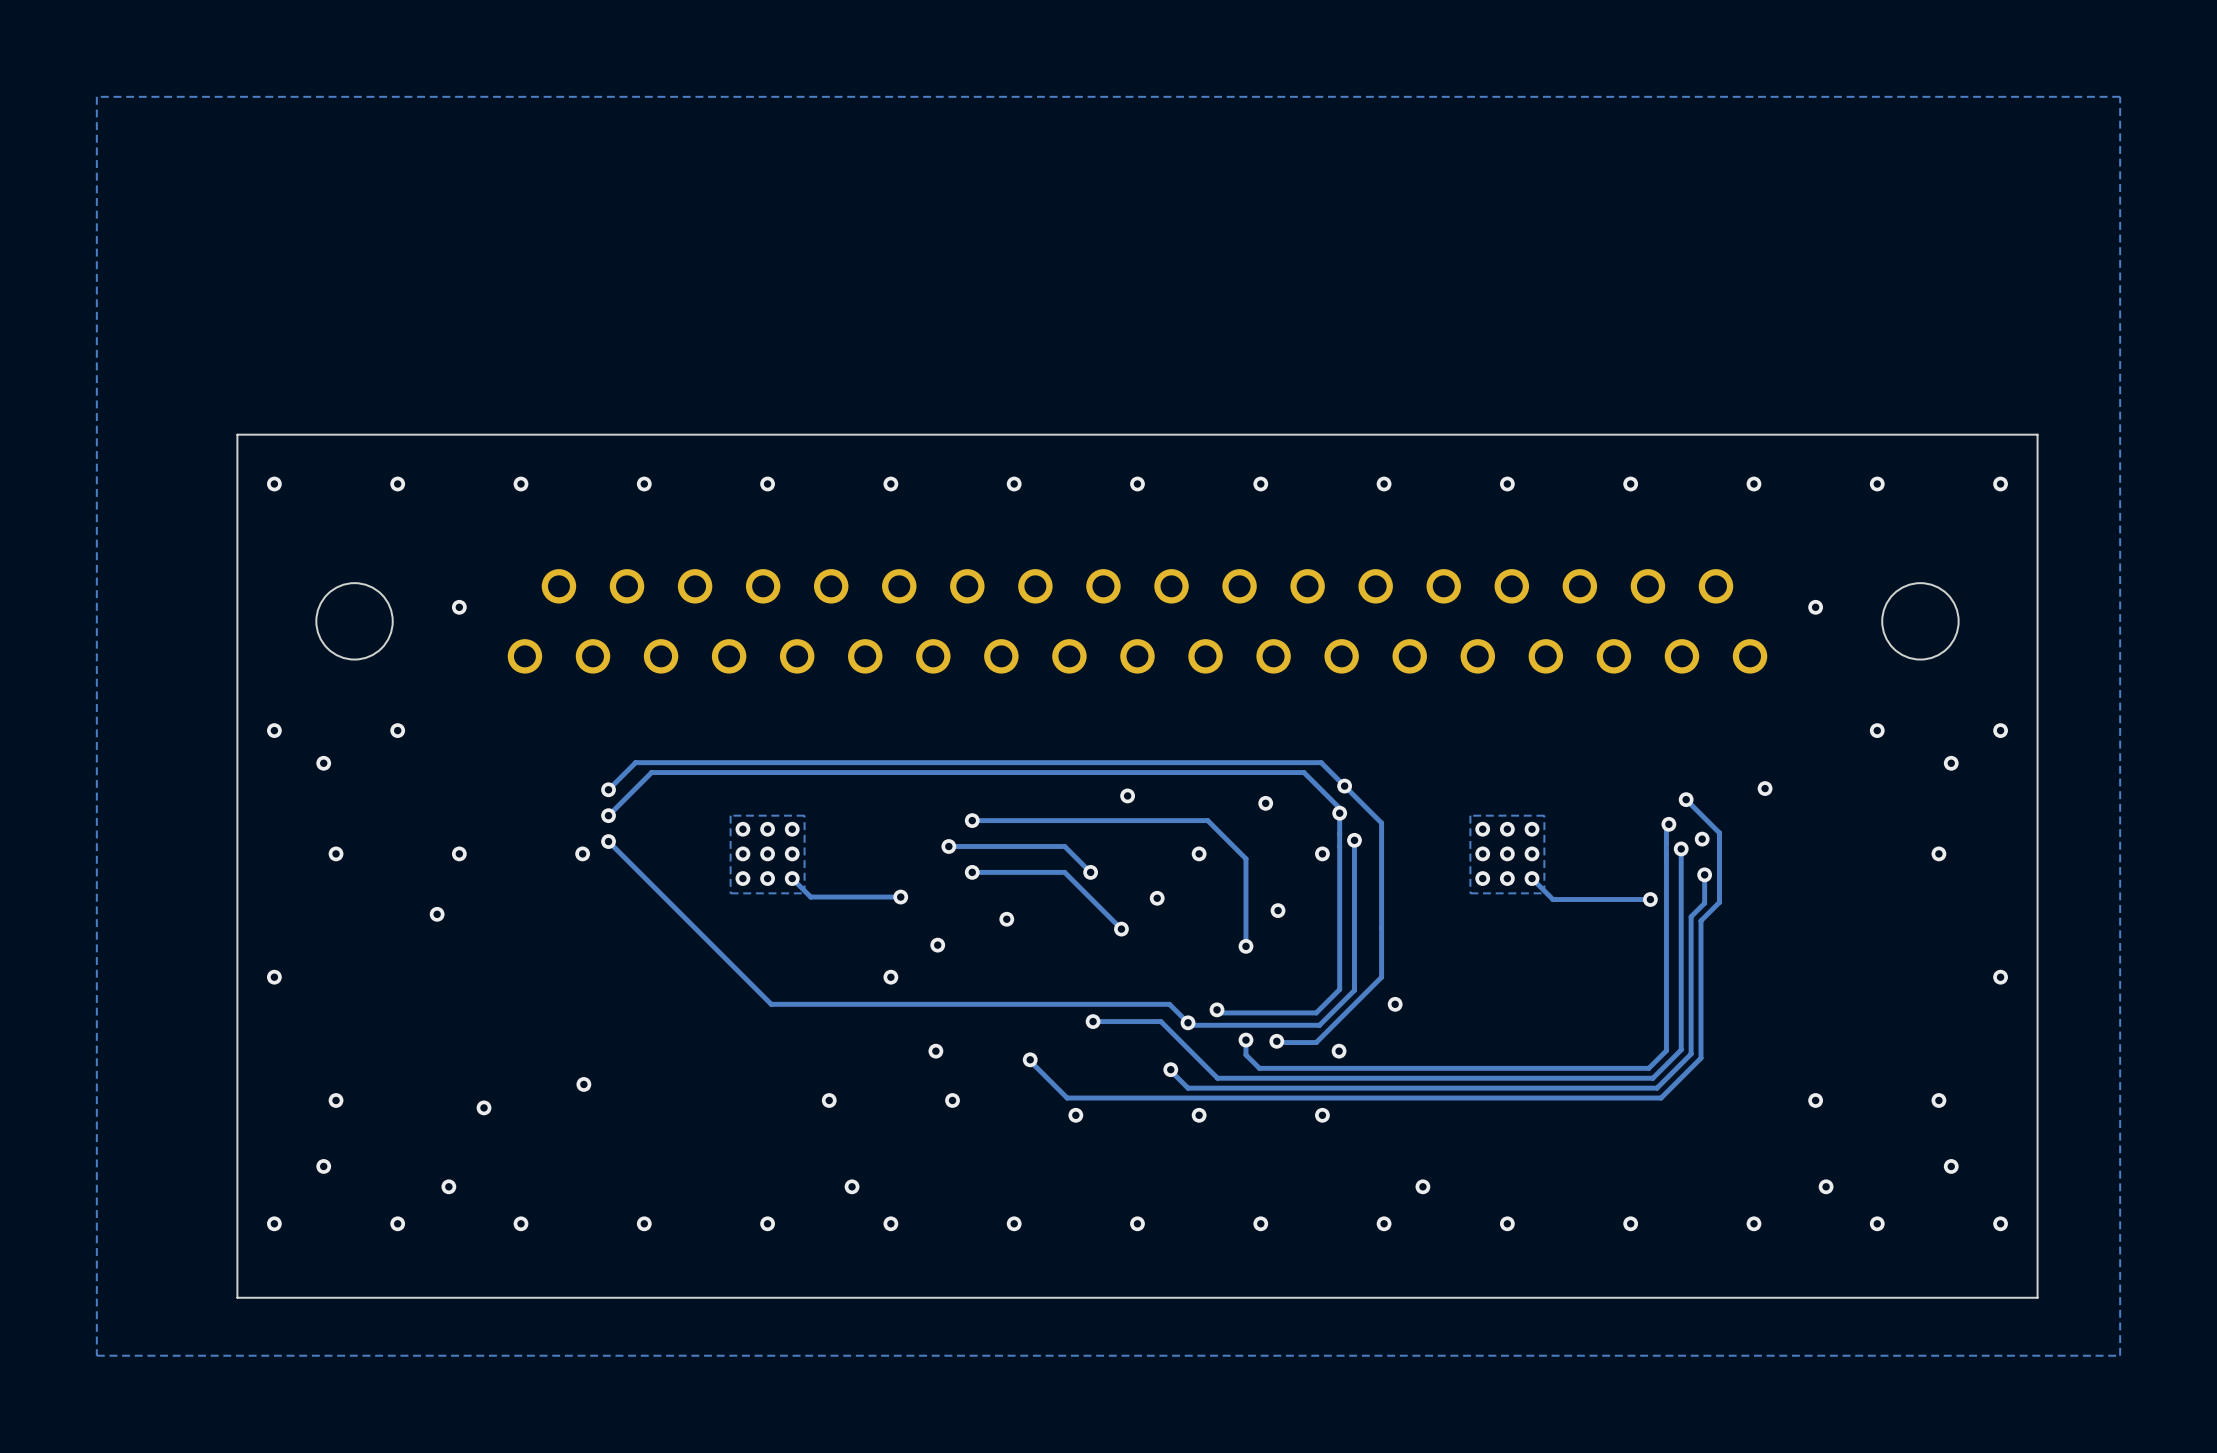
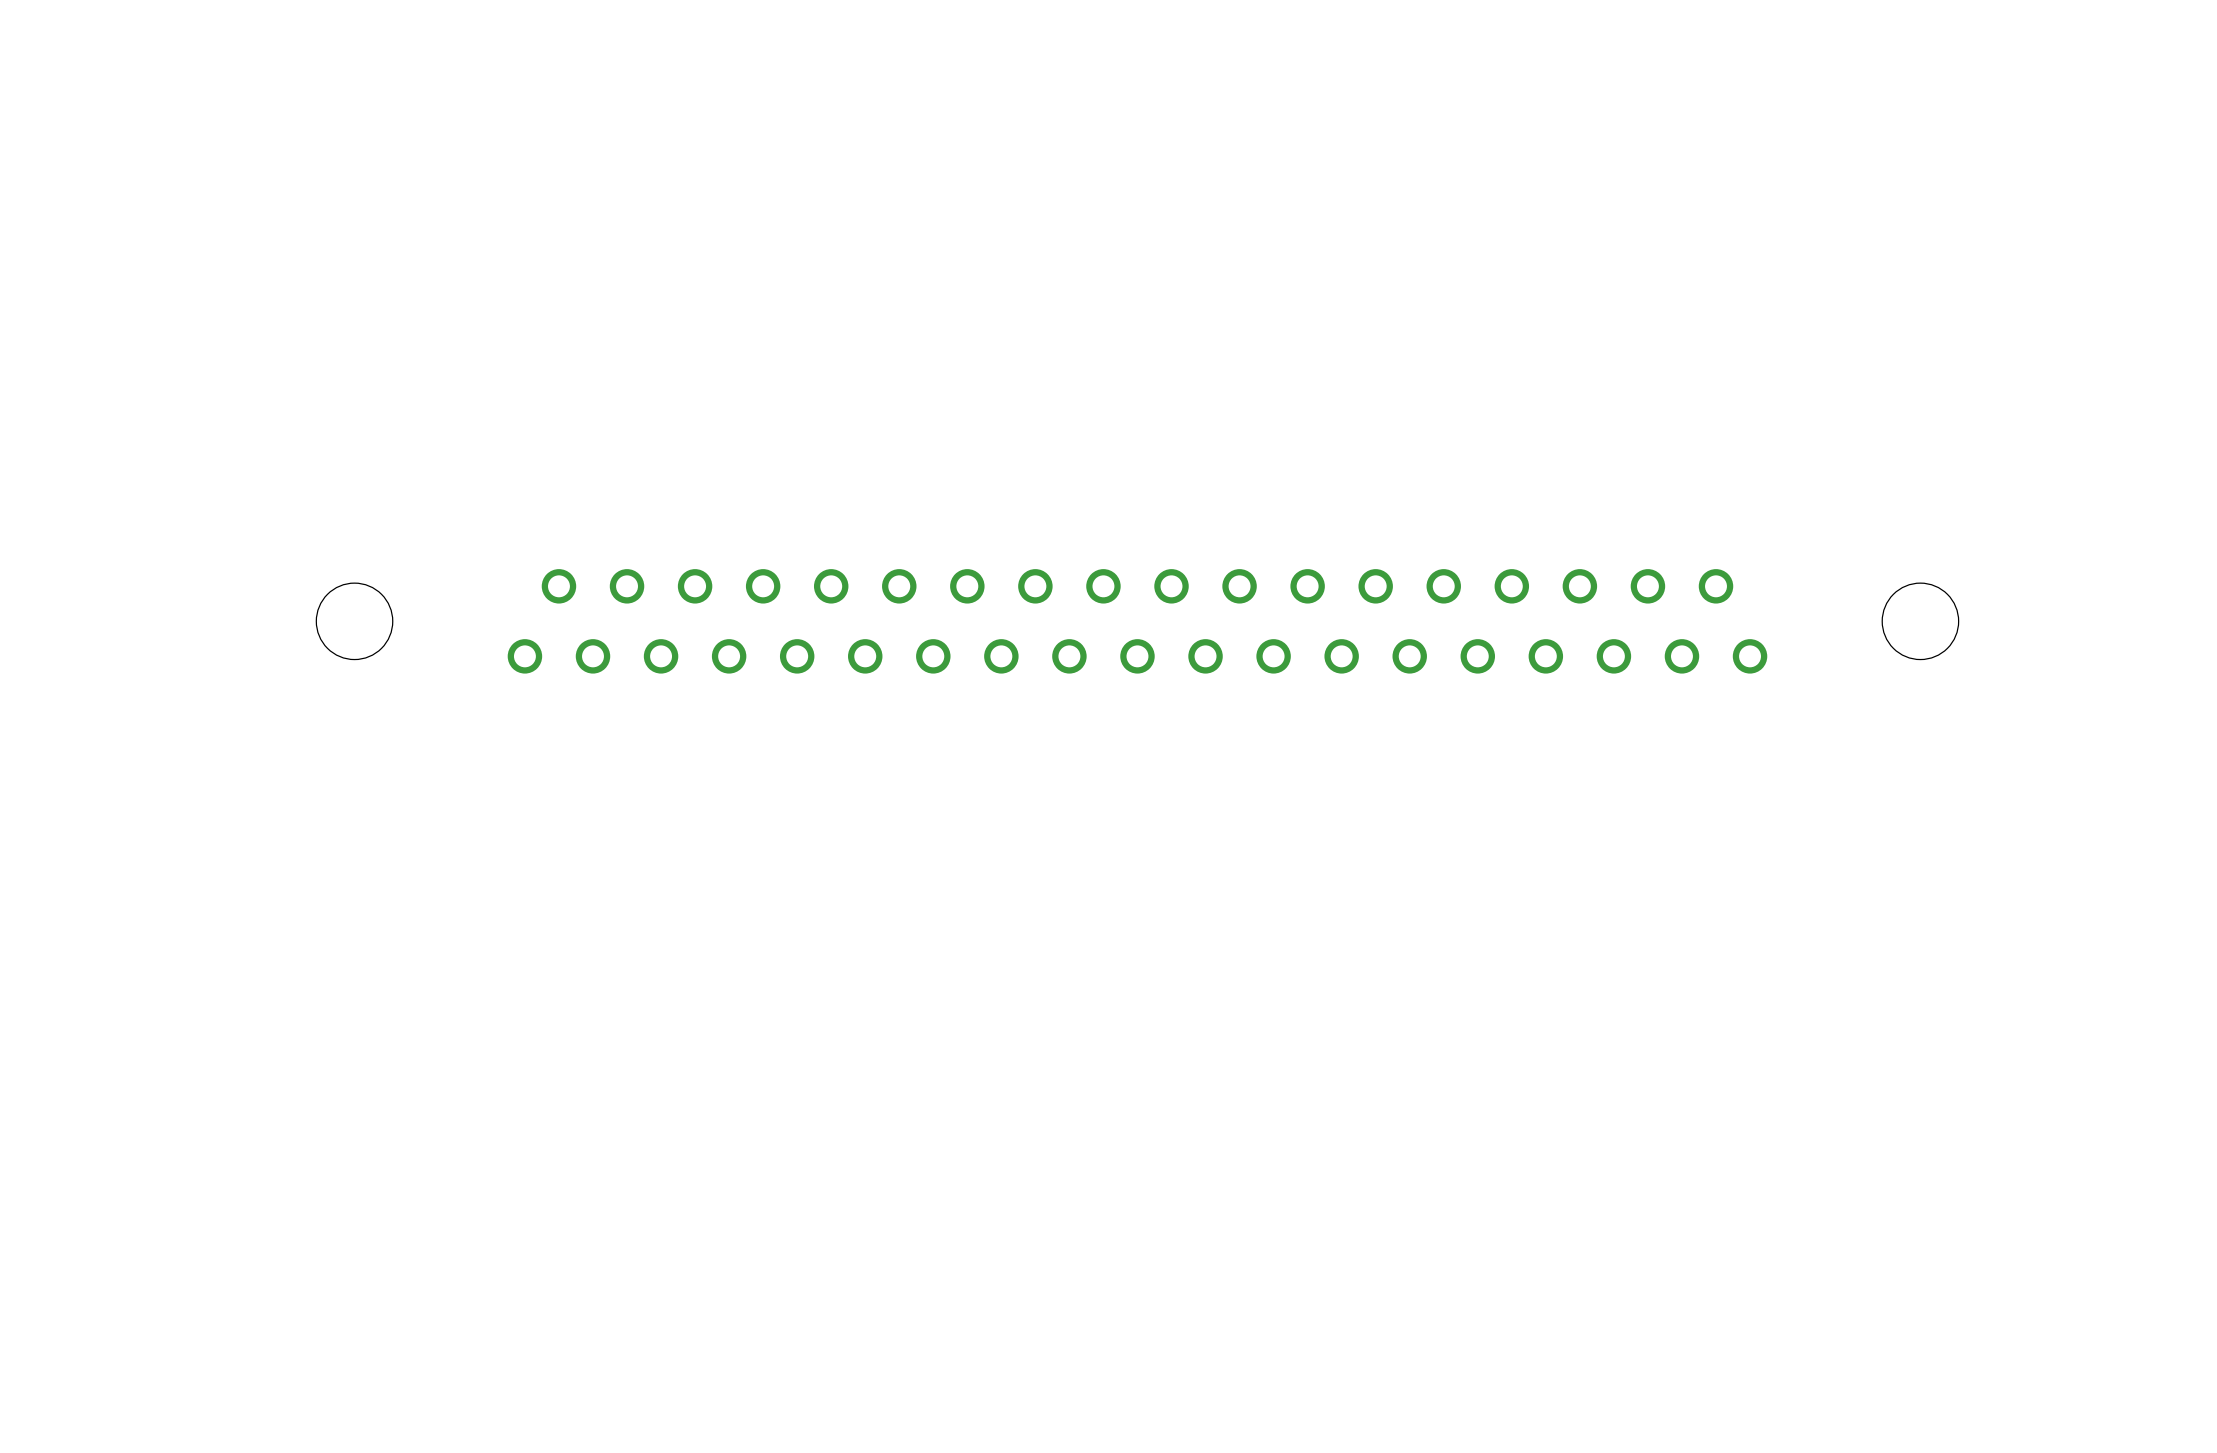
zone outline: (2120, 96) (96, 96) (96, 1355) (2120, 1355) (2120, 96) -> none
board edge: (2037, 434) (237, 434) (237, 1297) (2037, 1297) (2037, 434) -> none
via: (274, 484) -> none
via: (397, 484) -> none
via: (520, 484) -> none
via: (644, 484) -> none
via: (767, 484) -> none
via: (890, 484) -> none
via: (1014, 484) -> none
via: (1137, 484) -> none
via: (1260, 484) -> none
via: (1384, 484) -> none
via: (1507, 484) -> none
via: (1630, 484) -> none
via: (1753, 484) -> none
via: (1877, 484) -> none
via: (2000, 484) -> none
via: (459, 607) -> none
via: (1815, 607) -> none
via: (274, 730) -> none
via: (397, 730) -> none
via: (1877, 730) -> none
via: (2000, 730) -> none
via: (323, 763) -> none
via: (1951, 763) -> none
via: (1344, 786) -> none
via: (1765, 788) -> none
track: (608, 789) (635, 762) (1321, 762) (1381, 823) (1381, 977) (1316, 1042) (1276, 1041) -> none
via: (608, 789) -> none
via: (1127, 795) -> none
track: (1686, 799) (1719, 832) (1719, 902) (1701, 920) (1701, 1058) (1661, 1098) (1067, 1098) (1030, 1059) -> none
via: (1686, 799) -> none
via: (1265, 803) -> none
via: (1339, 813) -> none
track: (608, 815) (651, 772) (1303, 772) (1339, 808) (1339, 989) (1316, 1012) (1220, 1012) (1217, 1009) -> none
via: (608, 815) -> none
zone outline: (804, 815) (730, 815) (730, 893) (804, 893) (804, 815) -> none
zone outline: (1544, 815) (1470, 815) (1470, 893) (1544, 893) (1544, 815) -> none
track: (972, 820) (1207, 820) (1245, 858) (1245, 946) -> none
via: (972, 820) -> none
track: (1668, 824) (1666, 826) (1666, 1050) (1648, 1068) (1259, 1068) (1245, 1054) (1245, 1040) -> none
via: (1668, 824) -> none
via: (742, 829) -> none
via: (767, 829) -> none
via: (792, 829) -> none
via: (1482, 829) -> none
via: (1507, 829) -> none
via: (1532, 829) -> none
via: (1702, 839) -> none
track: (1354, 840) (1354, 990) (1319, 1025) (1190, 1025) (1169, 1004) (771, 1004) (608, 841) -> none
via: (1354, 840) -> none
via: (608, 841) -> none
track: (948, 846) (1064, 846) (1090, 872) -> none
via: (948, 846) -> none
track: (1681, 848) (1681, 1049) (1652, 1078) (1217, 1078) (1160, 1021) (1093, 1021) -> none
via: (1681, 848) -> none
via: (336, 853) -> none
via: (459, 853) -> none
via: (582, 853) -> none
via: (742, 853) -> none
via: (767, 853) -> none
via: (792, 853) -> none
via: (1199, 853) -> none
via: (1322, 853) -> none
via: (1482, 853) -> none
via: (1507, 853) -> none
via: (1532, 853) -> none
via: (1938, 853) -> none
track: (972, 872) (1064, 872) (1121, 929) -> none
via: (972, 872) -> none
via: (1090, 872) -> none
track: (1704, 874) (1704, 903) (1691, 916) (1691, 1054) (1657, 1088) (1188, 1088) (1170, 1069) -> none
via: (1704, 874) -> none
via: (742, 878) -> none
via: (767, 878) -> none
track: (792, 878) (810, 897) (900, 897) -> none
via: (792, 878) -> none
via: (1482, 878) -> none
via: (1507, 878) -> none
track: (1532, 878) (1553, 899) (1650, 899) -> none
via: (1532, 878) -> none
via: (900, 897) -> none
via: (1157, 898) -> none
via: (1650, 899) -> none
via: (1278, 910) -> none
via: (437, 914) -> none
via: (1006, 919) -> none
via: (1121, 929) -> none
via: (937, 945) -> none
via: (1245, 946) -> none
via: (274, 977) -> none
via: (890, 977) -> none
via: (2000, 977) -> none
via: (1395, 1004) -> none
via: (1217, 1009) -> none
via: (1093, 1021) -> none
via: (1188, 1022) -> none
via: (1245, 1040) -> none
via: (1276, 1041) -> none
via: (935, 1051) -> none
via: (1339, 1051) -> none
via: (1030, 1059) -> none
via: (1170, 1069) -> none
via: (583, 1084) -> none
via: (336, 1100) -> none
via: (829, 1100) -> none
via: (952, 1100) -> none
via: (1815, 1100) -> none
via: (1938, 1100) -> none
via: (484, 1107) -> none
via: (1075, 1115) -> none
via: (1199, 1115) -> none
via: (1322, 1115) -> none
via: (323, 1166) -> none
via: (1951, 1166) -> none
via: (448, 1186) -> none
via: (852, 1186) -> none
via: (1422, 1186) -> none
via: (1826, 1186) -> none
via: (274, 1223) -> none
via: (397, 1223) -> none
via: (520, 1223) -> none
via: (644, 1223) -> none
via: (767, 1223) -> none
via: (890, 1223) -> none
via: (1014, 1223) -> none
via: (1137, 1223) -> none
via: (1260, 1223) -> none
via: (1384, 1223) -> none
via: (1507, 1223) -> none
via: (1630, 1223) -> none
via: (1753, 1223) -> none
via: (1877, 1223) -> none
via: (2000, 1223) -> none

